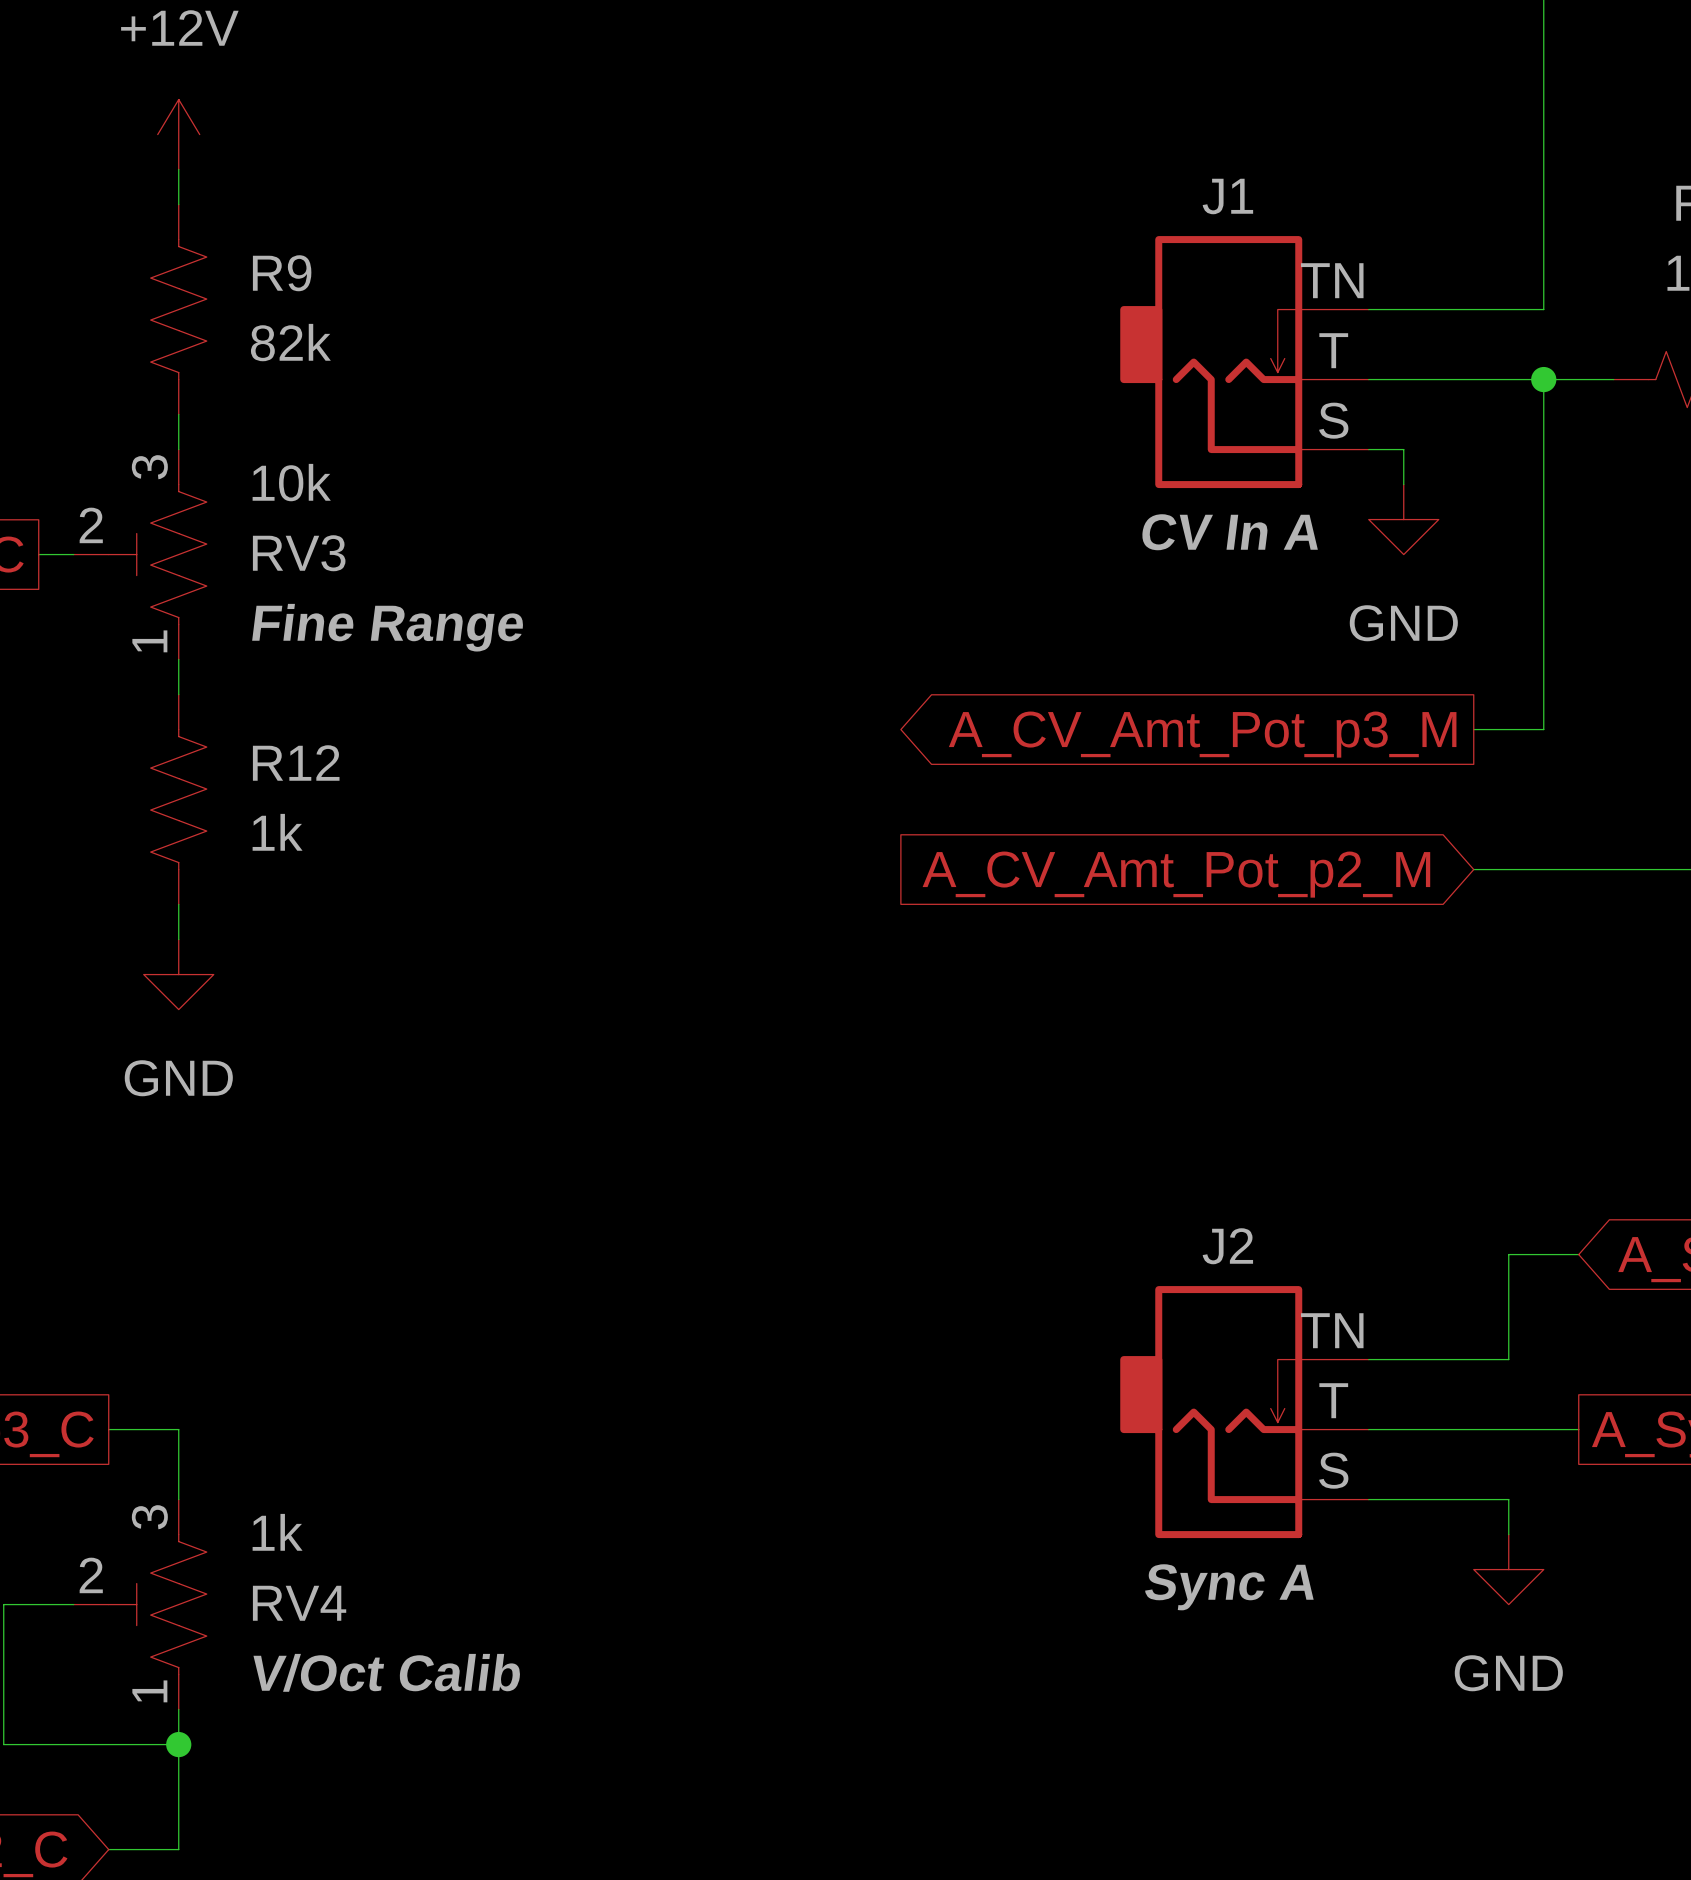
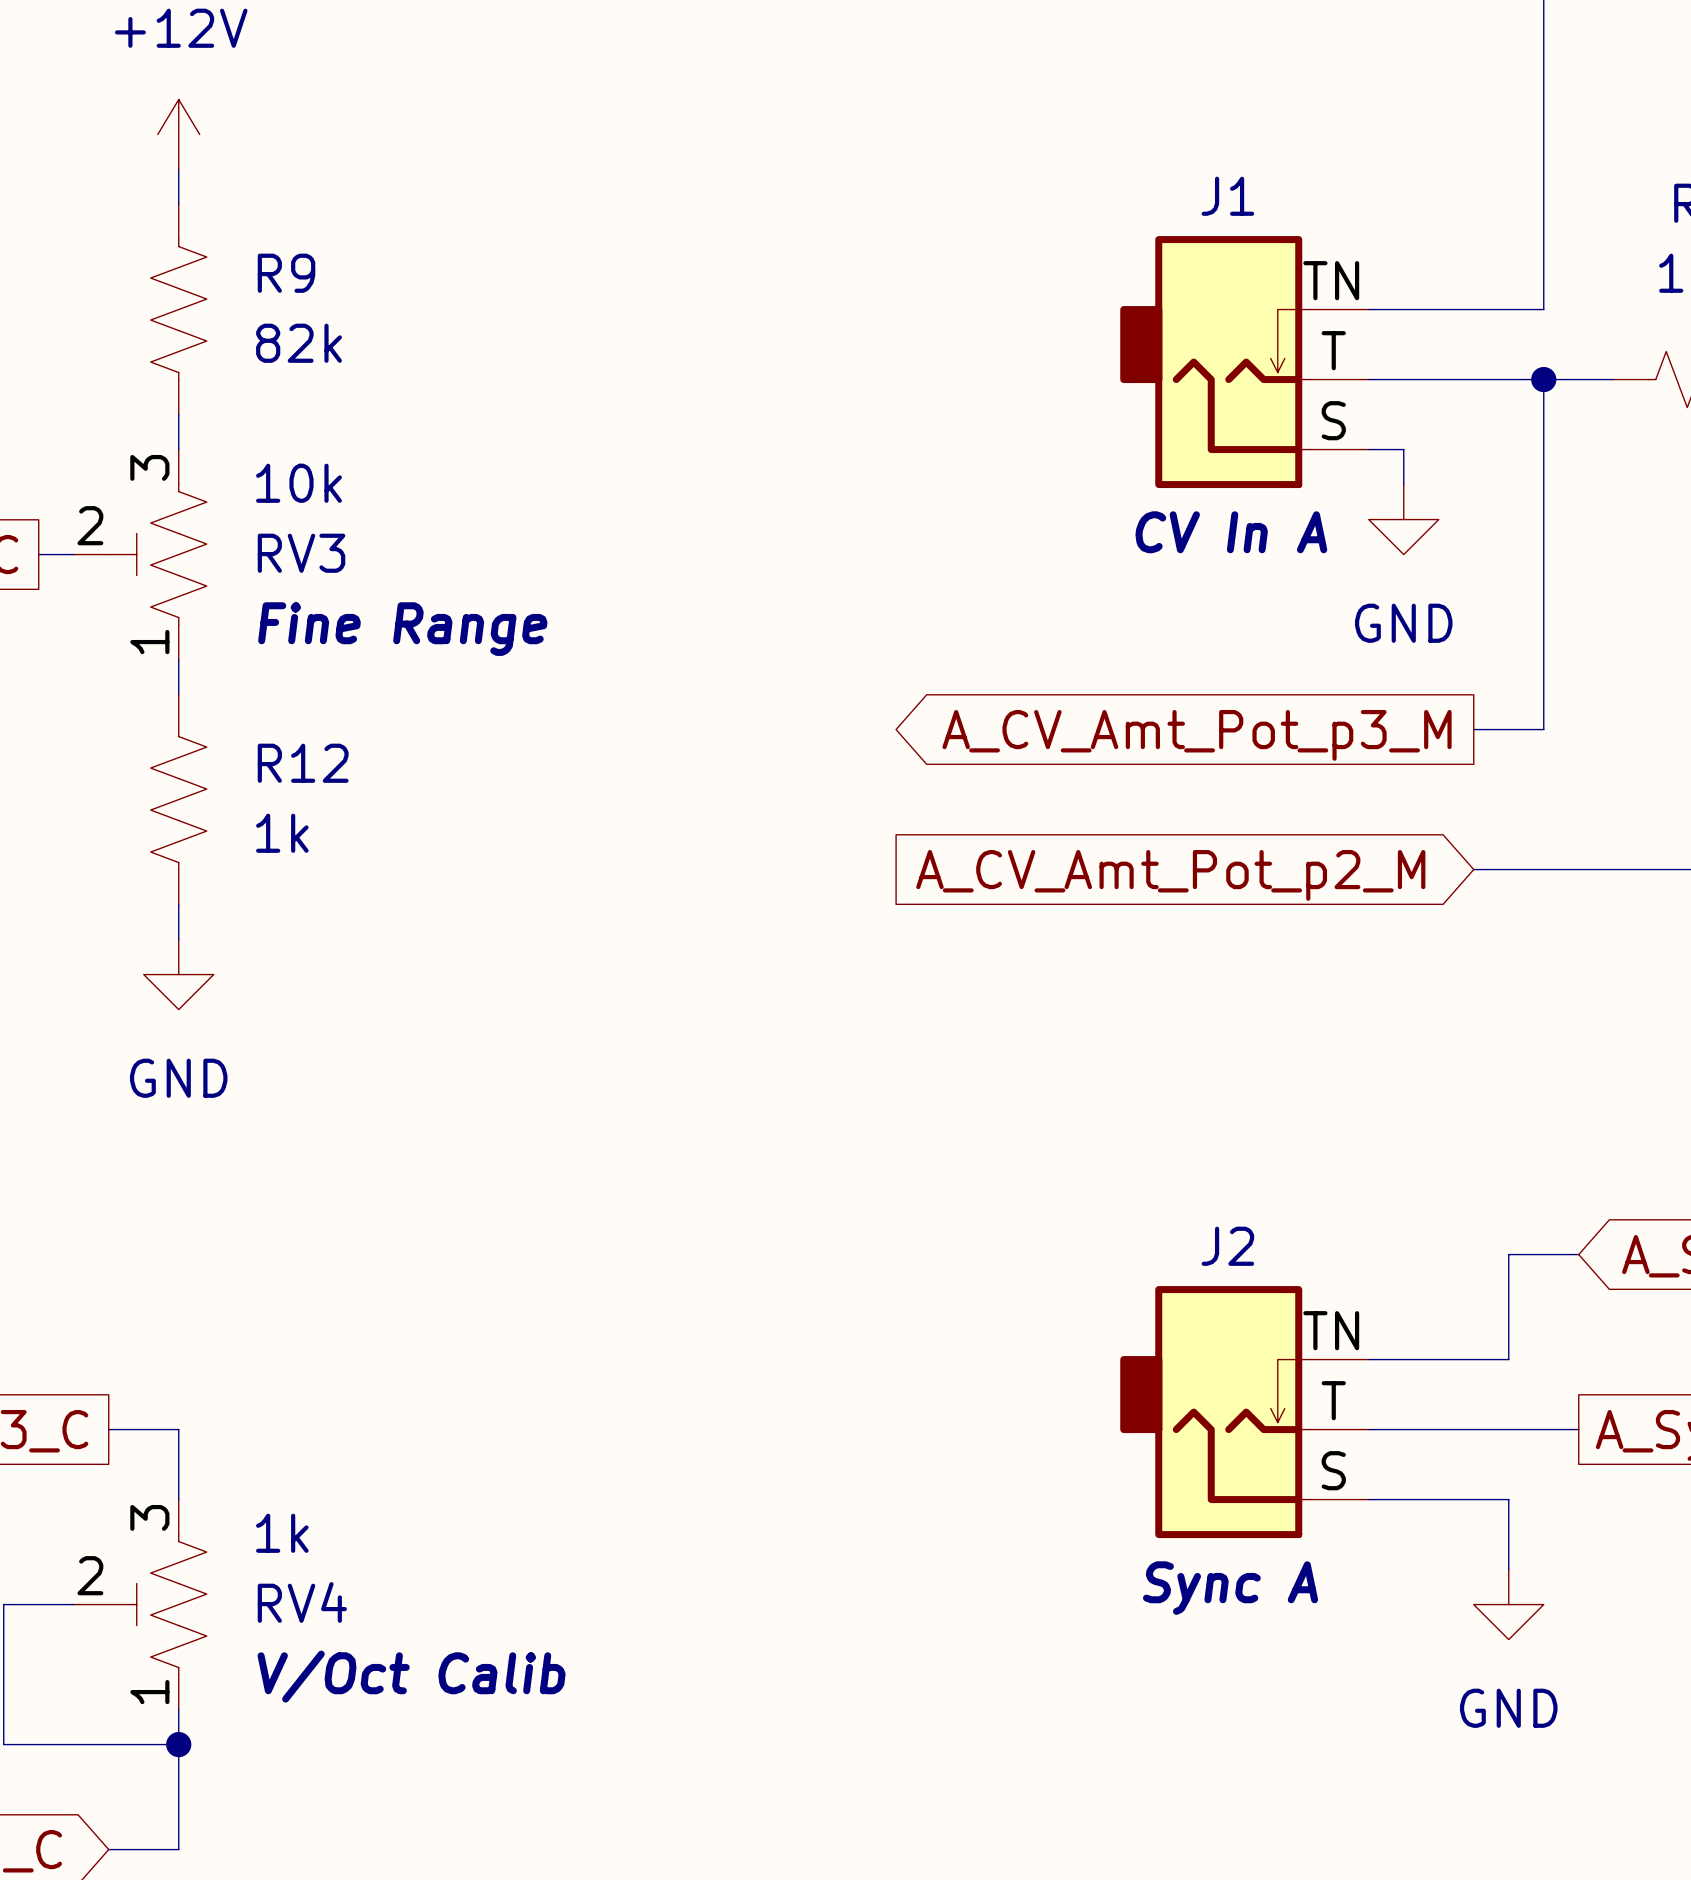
power symbol position: GND (1508, 1569) -> GND (1508, 1604)

